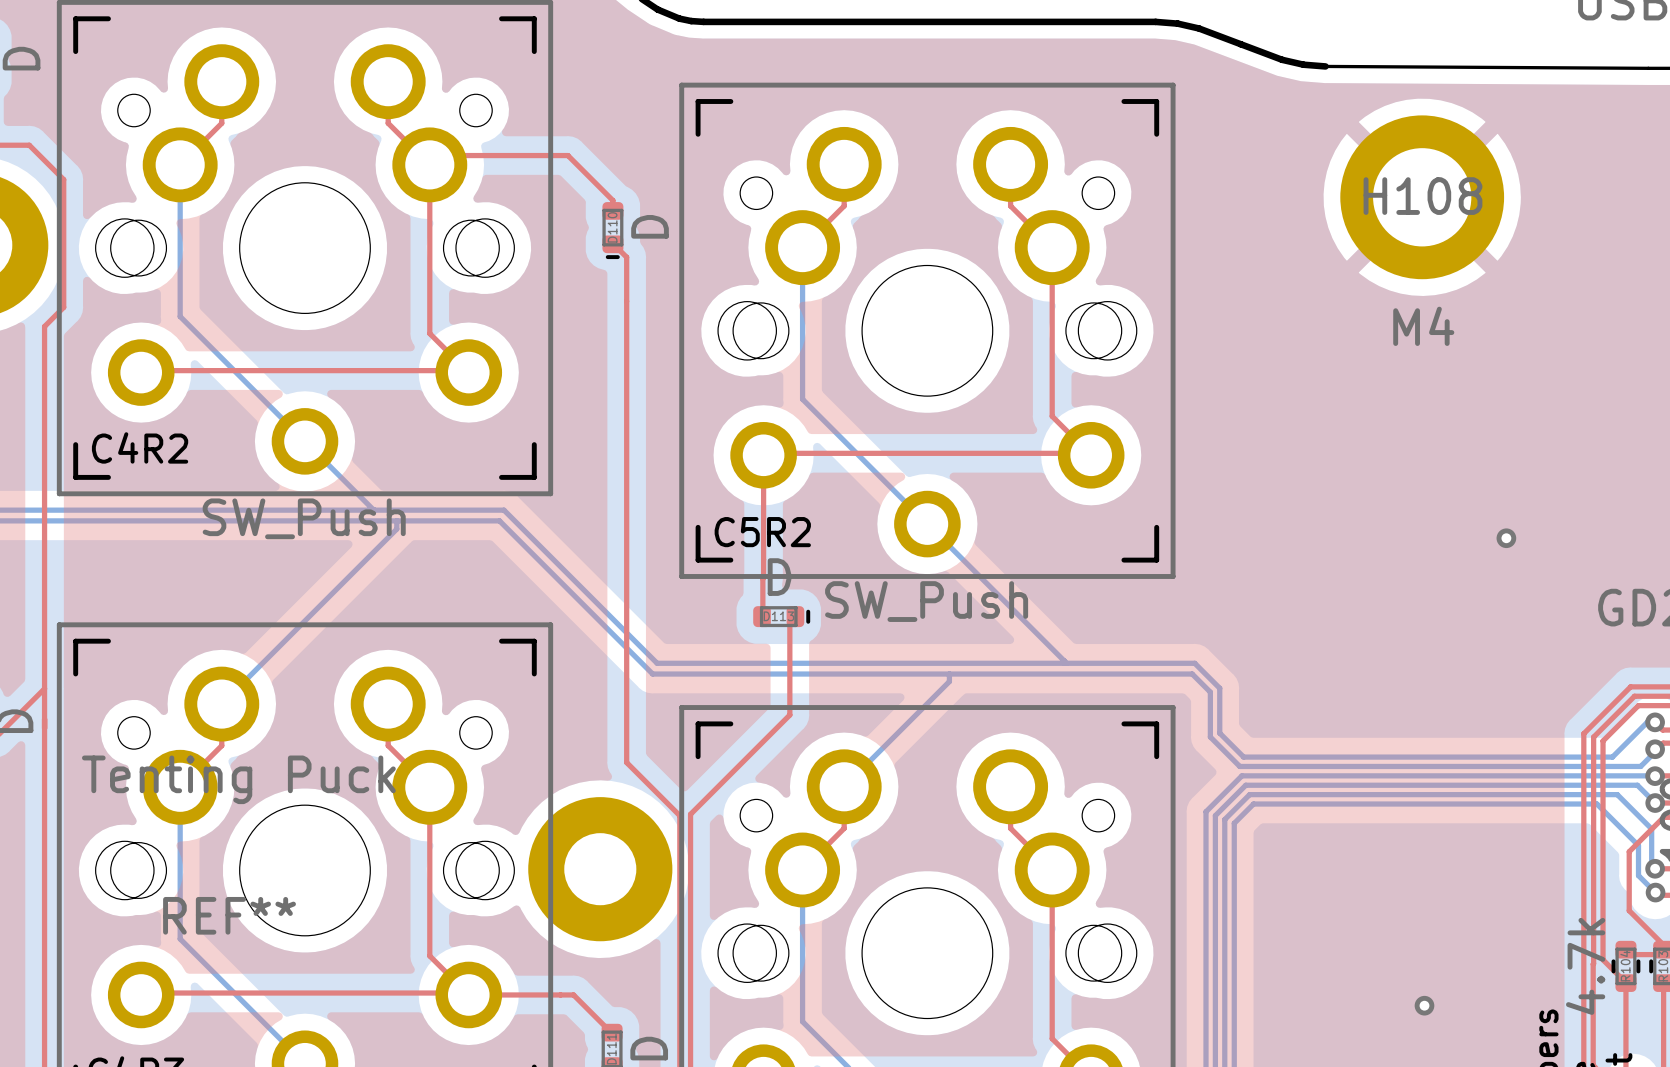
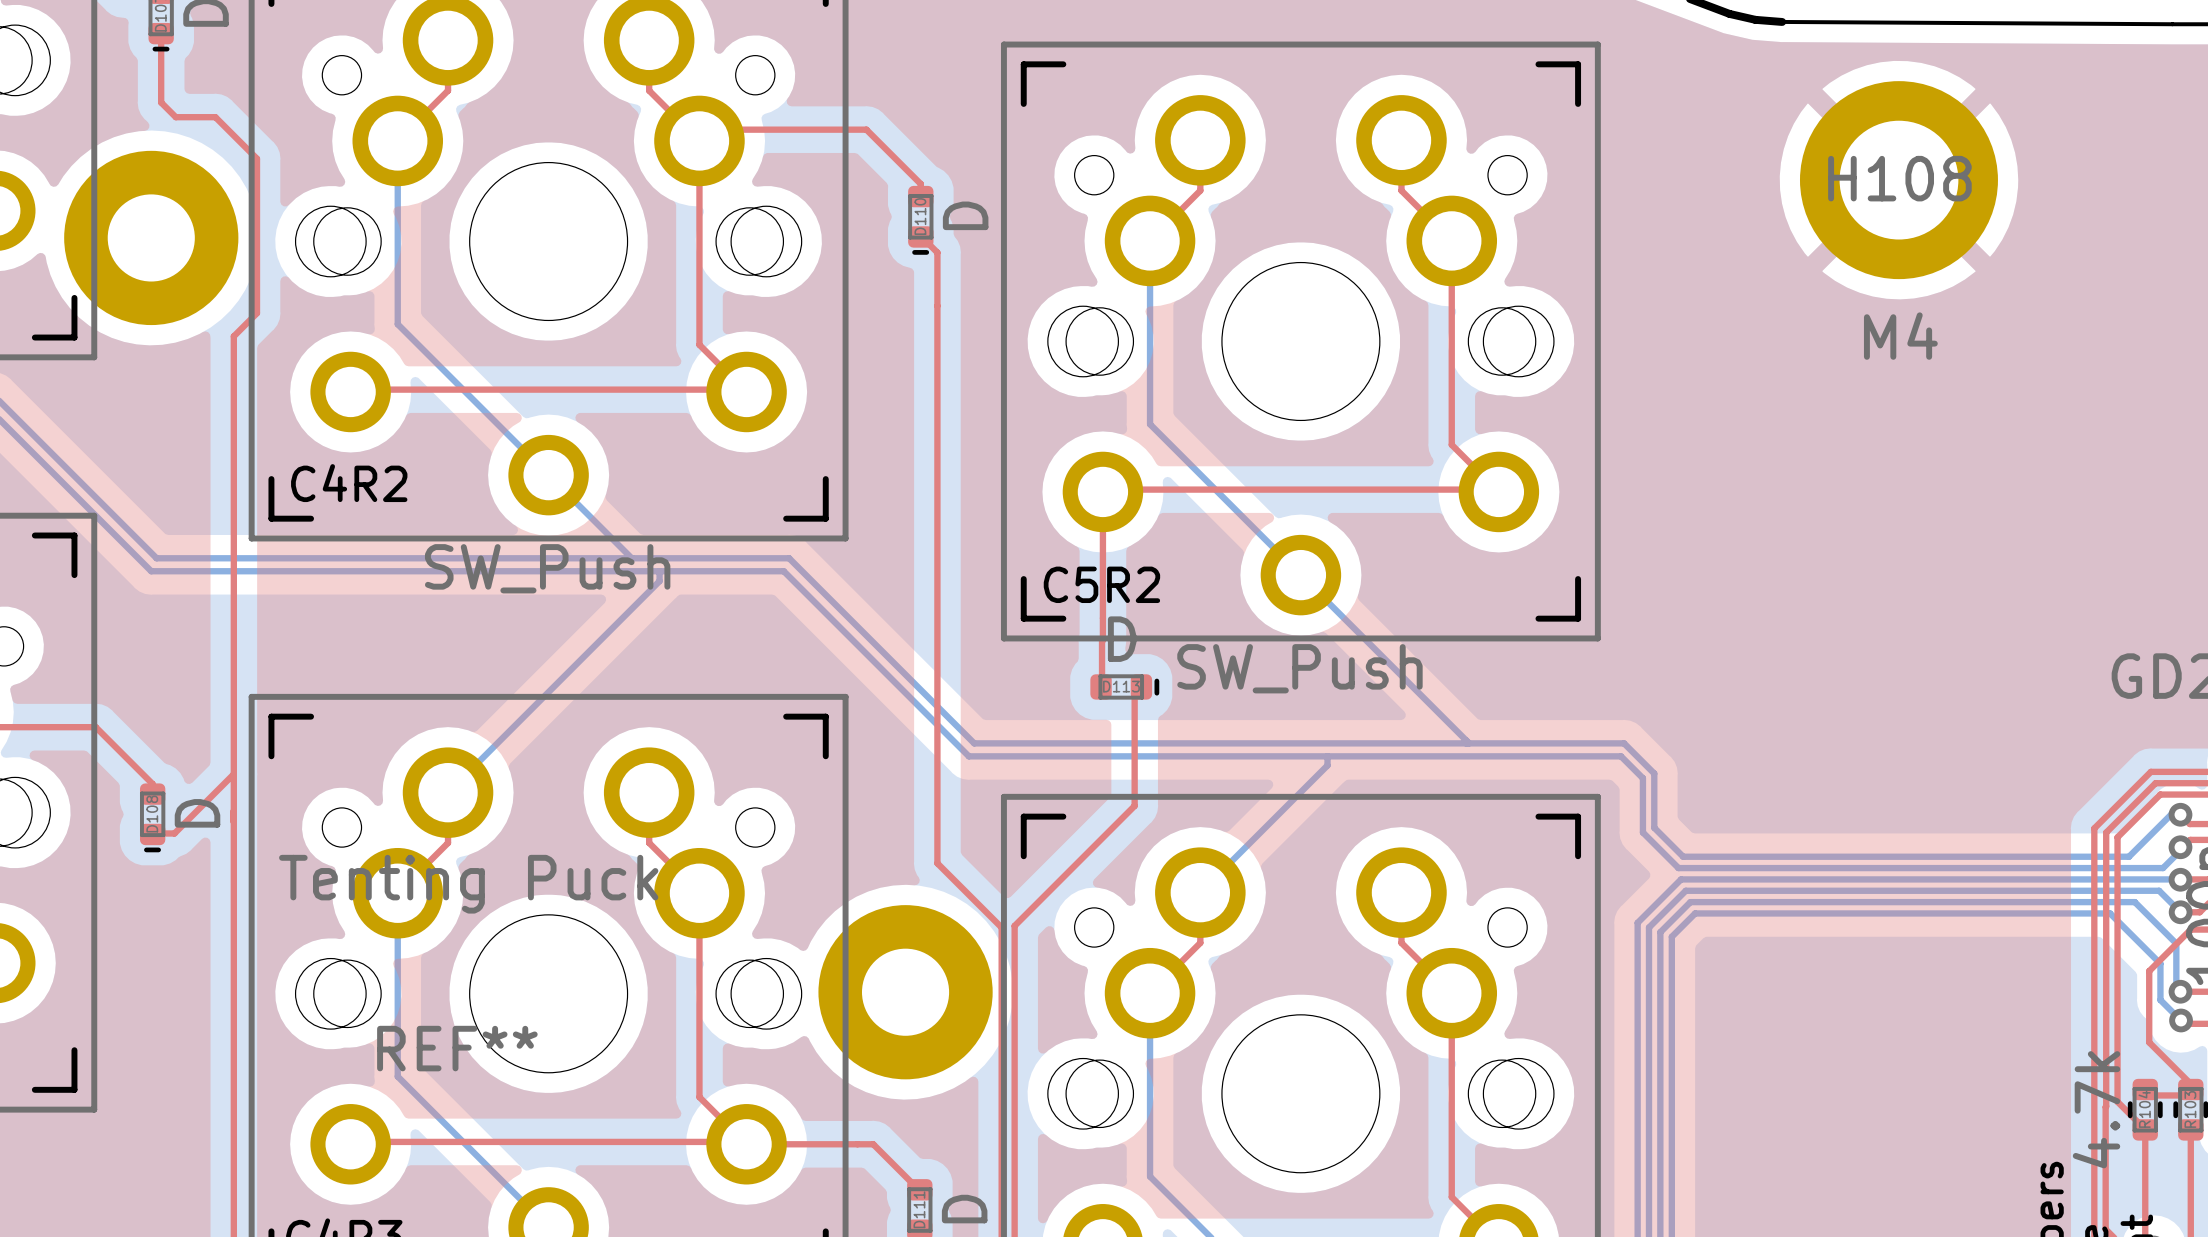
via: (1506, 538) -> none
via: (1424, 1005) -> none

